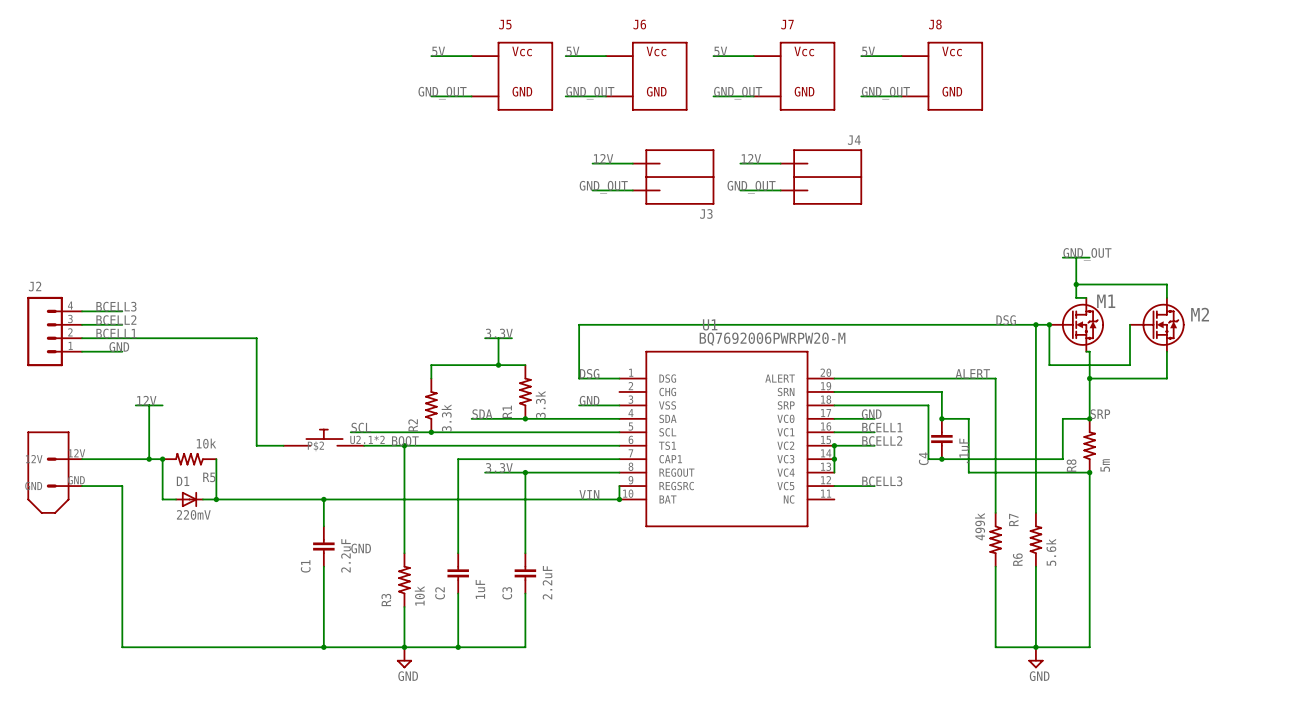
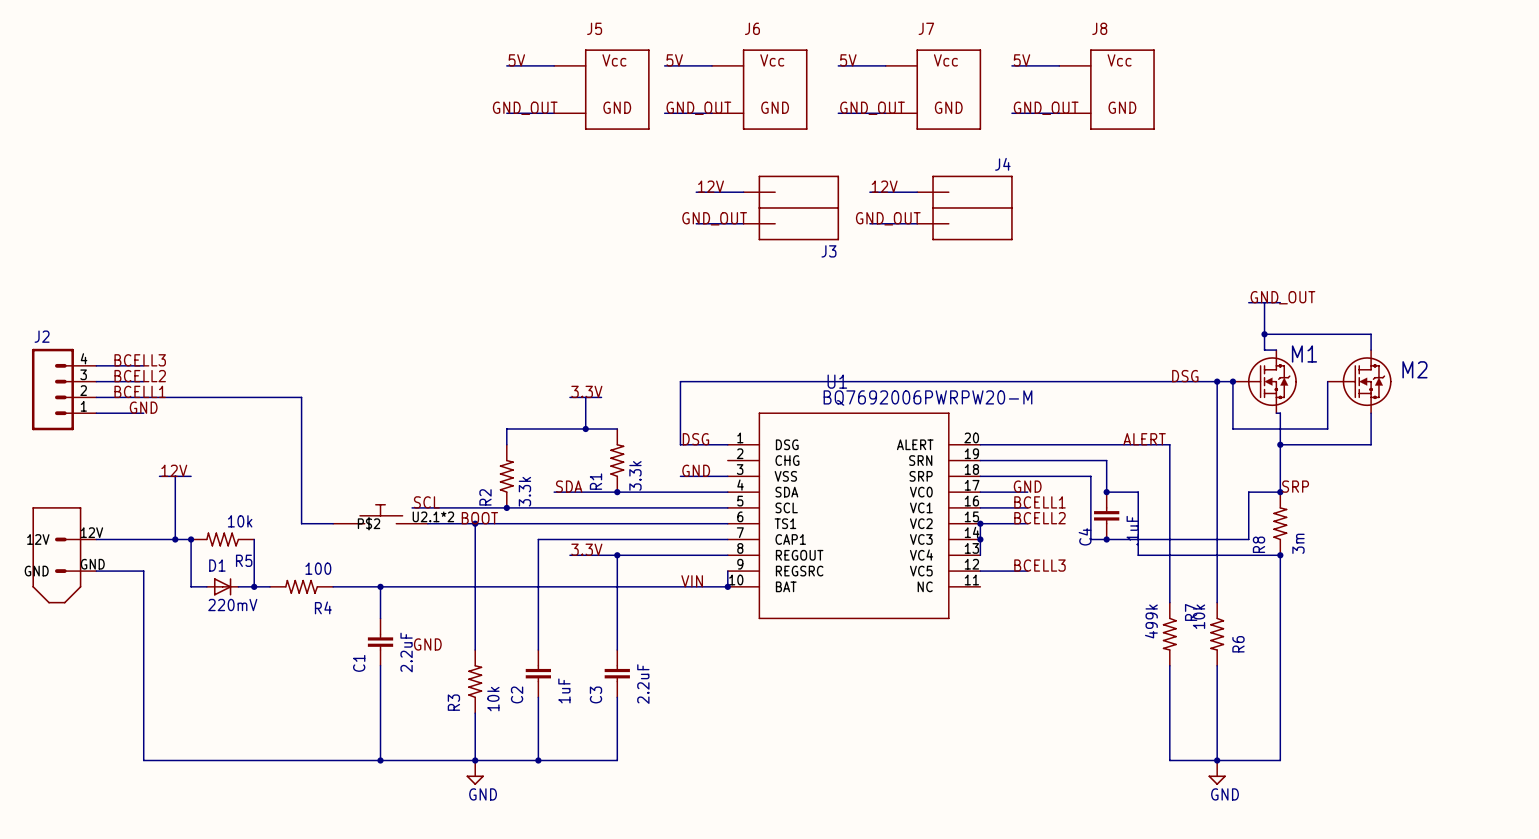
R8 value: 5m (1105, 465) -> 3m (1298, 543)
R4: none -> 100 (301, 586)
R6 rotation: 0° (1035, 539) -> 180° (1217, 634)
R6 value: 5.6k (1051, 552) -> 10k (1199, 616)
R6 name position: R6 (1017, 559) -> R6 (1238, 644)

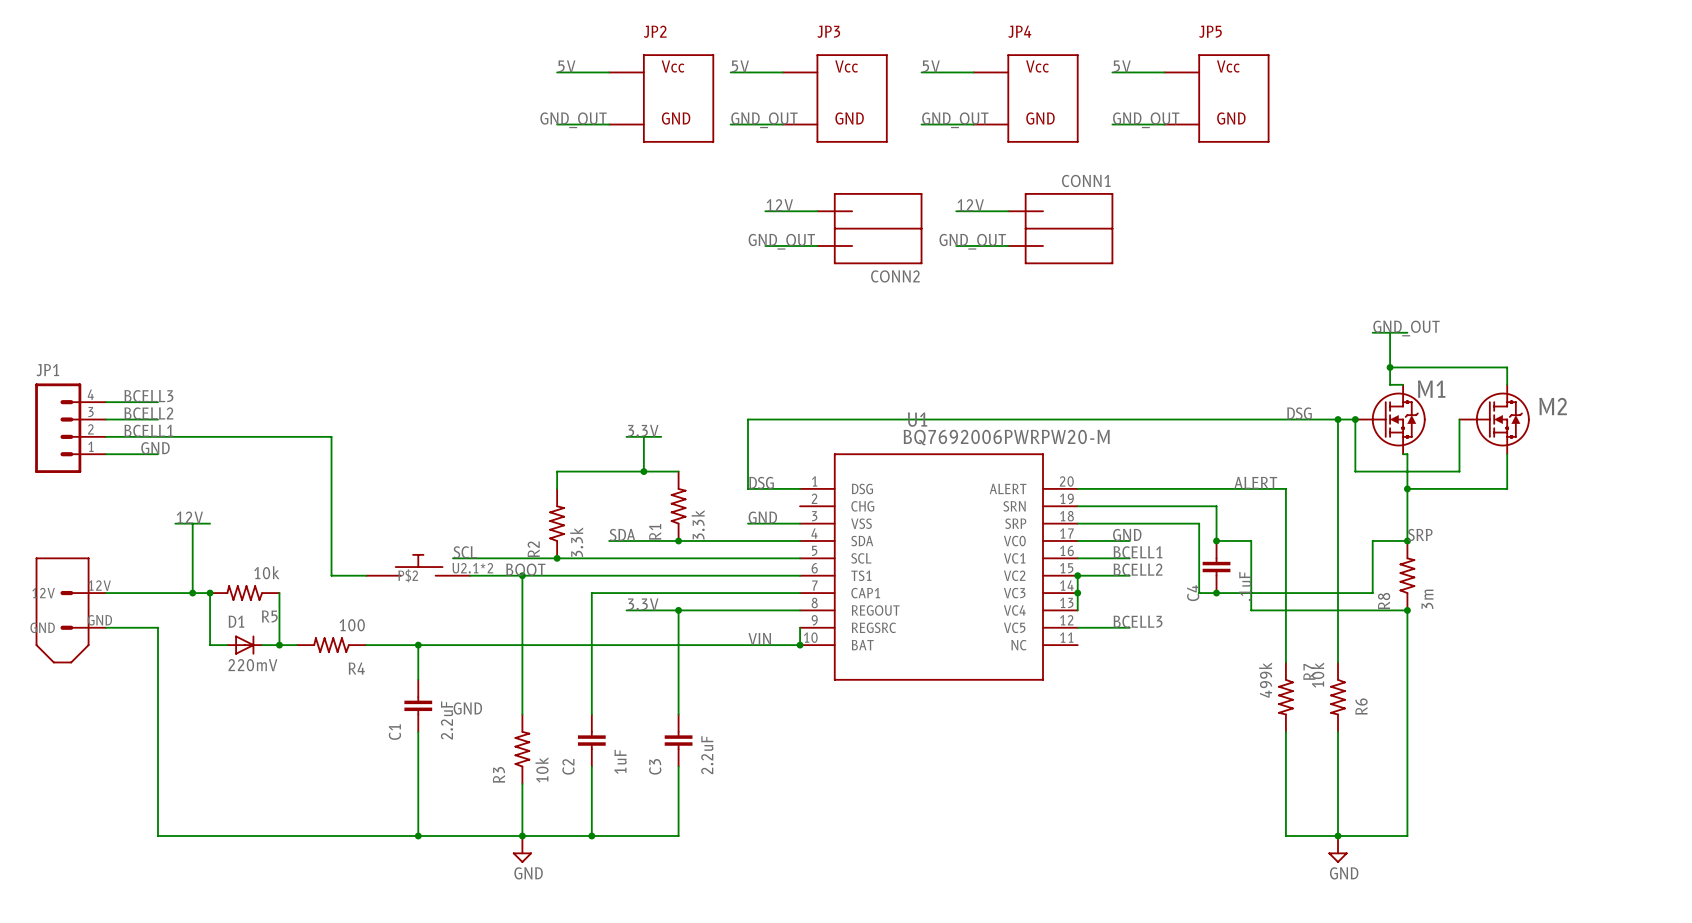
J5 name: J5 (594, 28) -> JP2 (655, 31)
J6 name: J6 (752, 28) -> JP3 (828, 31)
J7 name: J7 (926, 28) -> JP4 (1019, 31)
J8 name: J8 (1099, 28) -> JP5 (1210, 31)
J4 name: J4 (1002, 164) -> CONN1 (1086, 180)
J3 name: J3 (828, 251) -> CONN2 (895, 276)
J2 name: J2 (42, 336) -> JP1 (47, 370)

